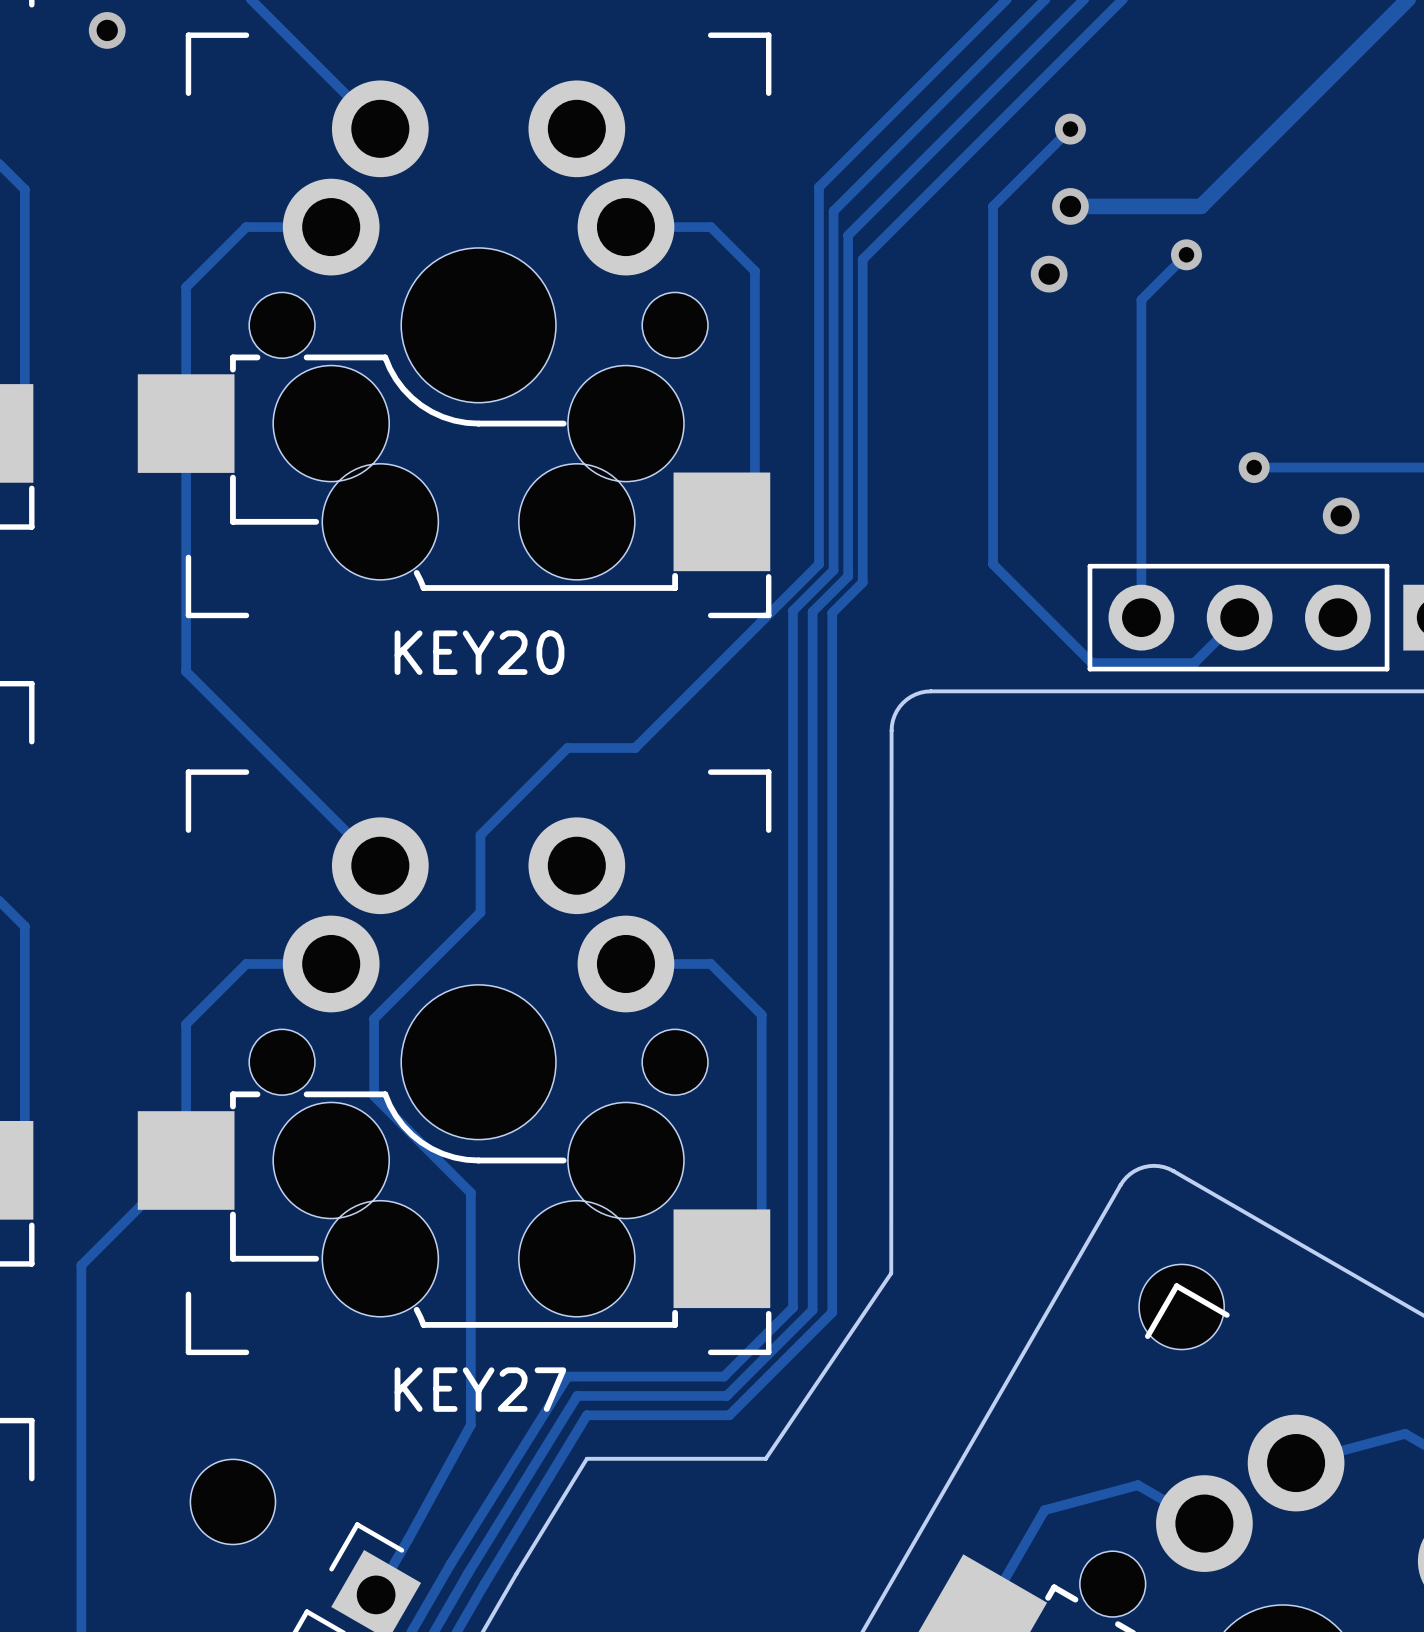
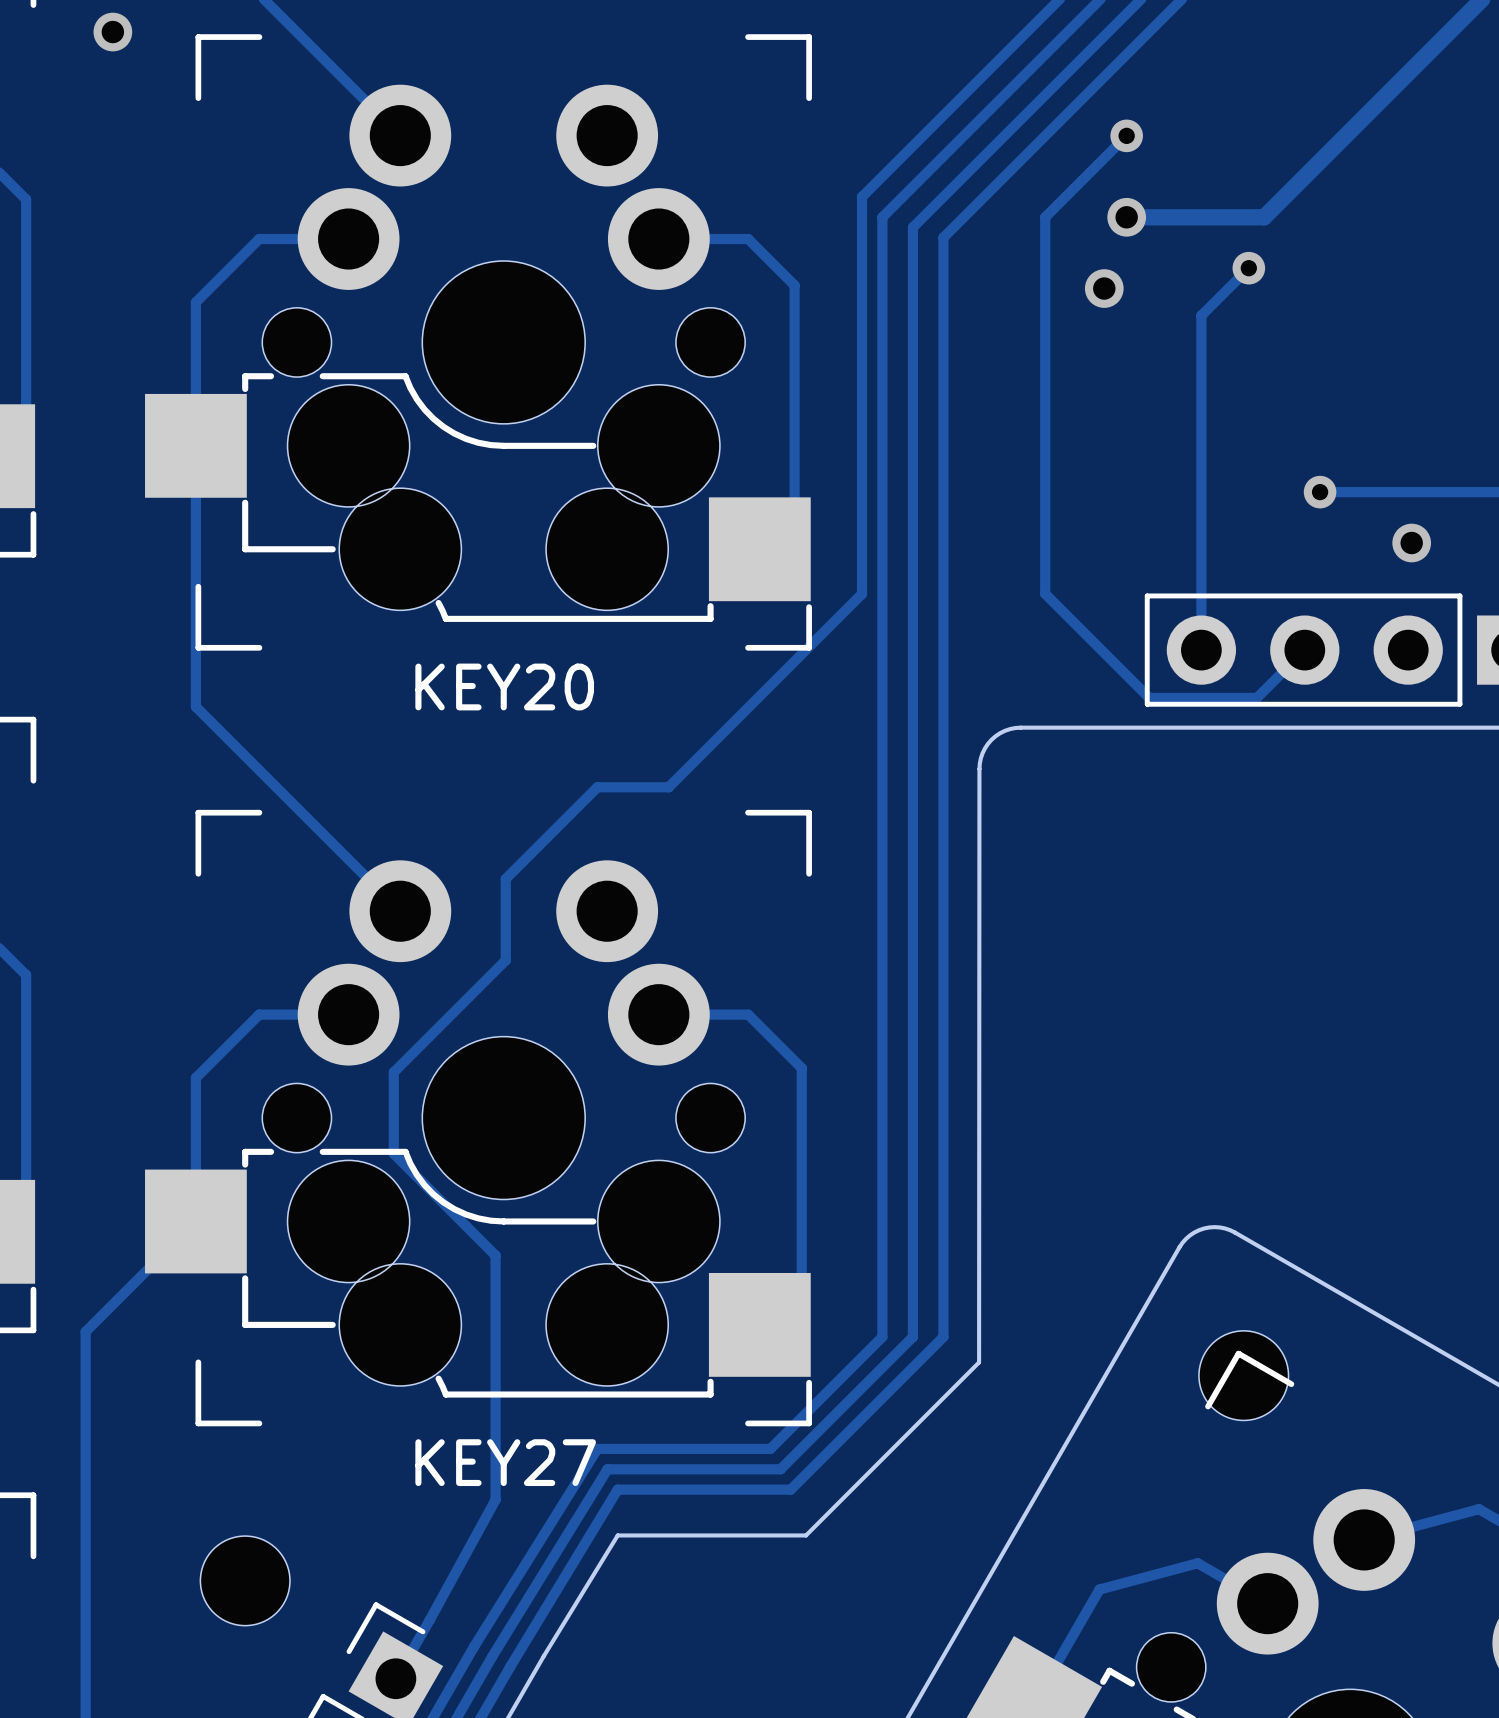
track: (838, 206) (833, 211) (833, 570) (792, 610) (792, 1307) (724, 1376) -> (882, 217) (882, 1336) (770, 1448) (762, 1448)
track: (867, 216) (848, 235) (848, 576) (812, 611) (812, 1309) (726, 1395) -> (912, 227) (912, 1336) (780, 1469) (764, 1469)
track: (896, 225) (862, 259) (862, 582) (832, 612) (832, 1312) (729, 1415) -> (943, 237) (943, 1336) (790, 1489) (767, 1489)
board edge: (969, 691) (930, 691) (915, 694) (899, 706) (891, 725) (891, 1273) (765, 1458) -> (1020, 727) (1004, 730) (991, 739) (984, 748) (979, 763) (979, 1362) (806, 1535)

